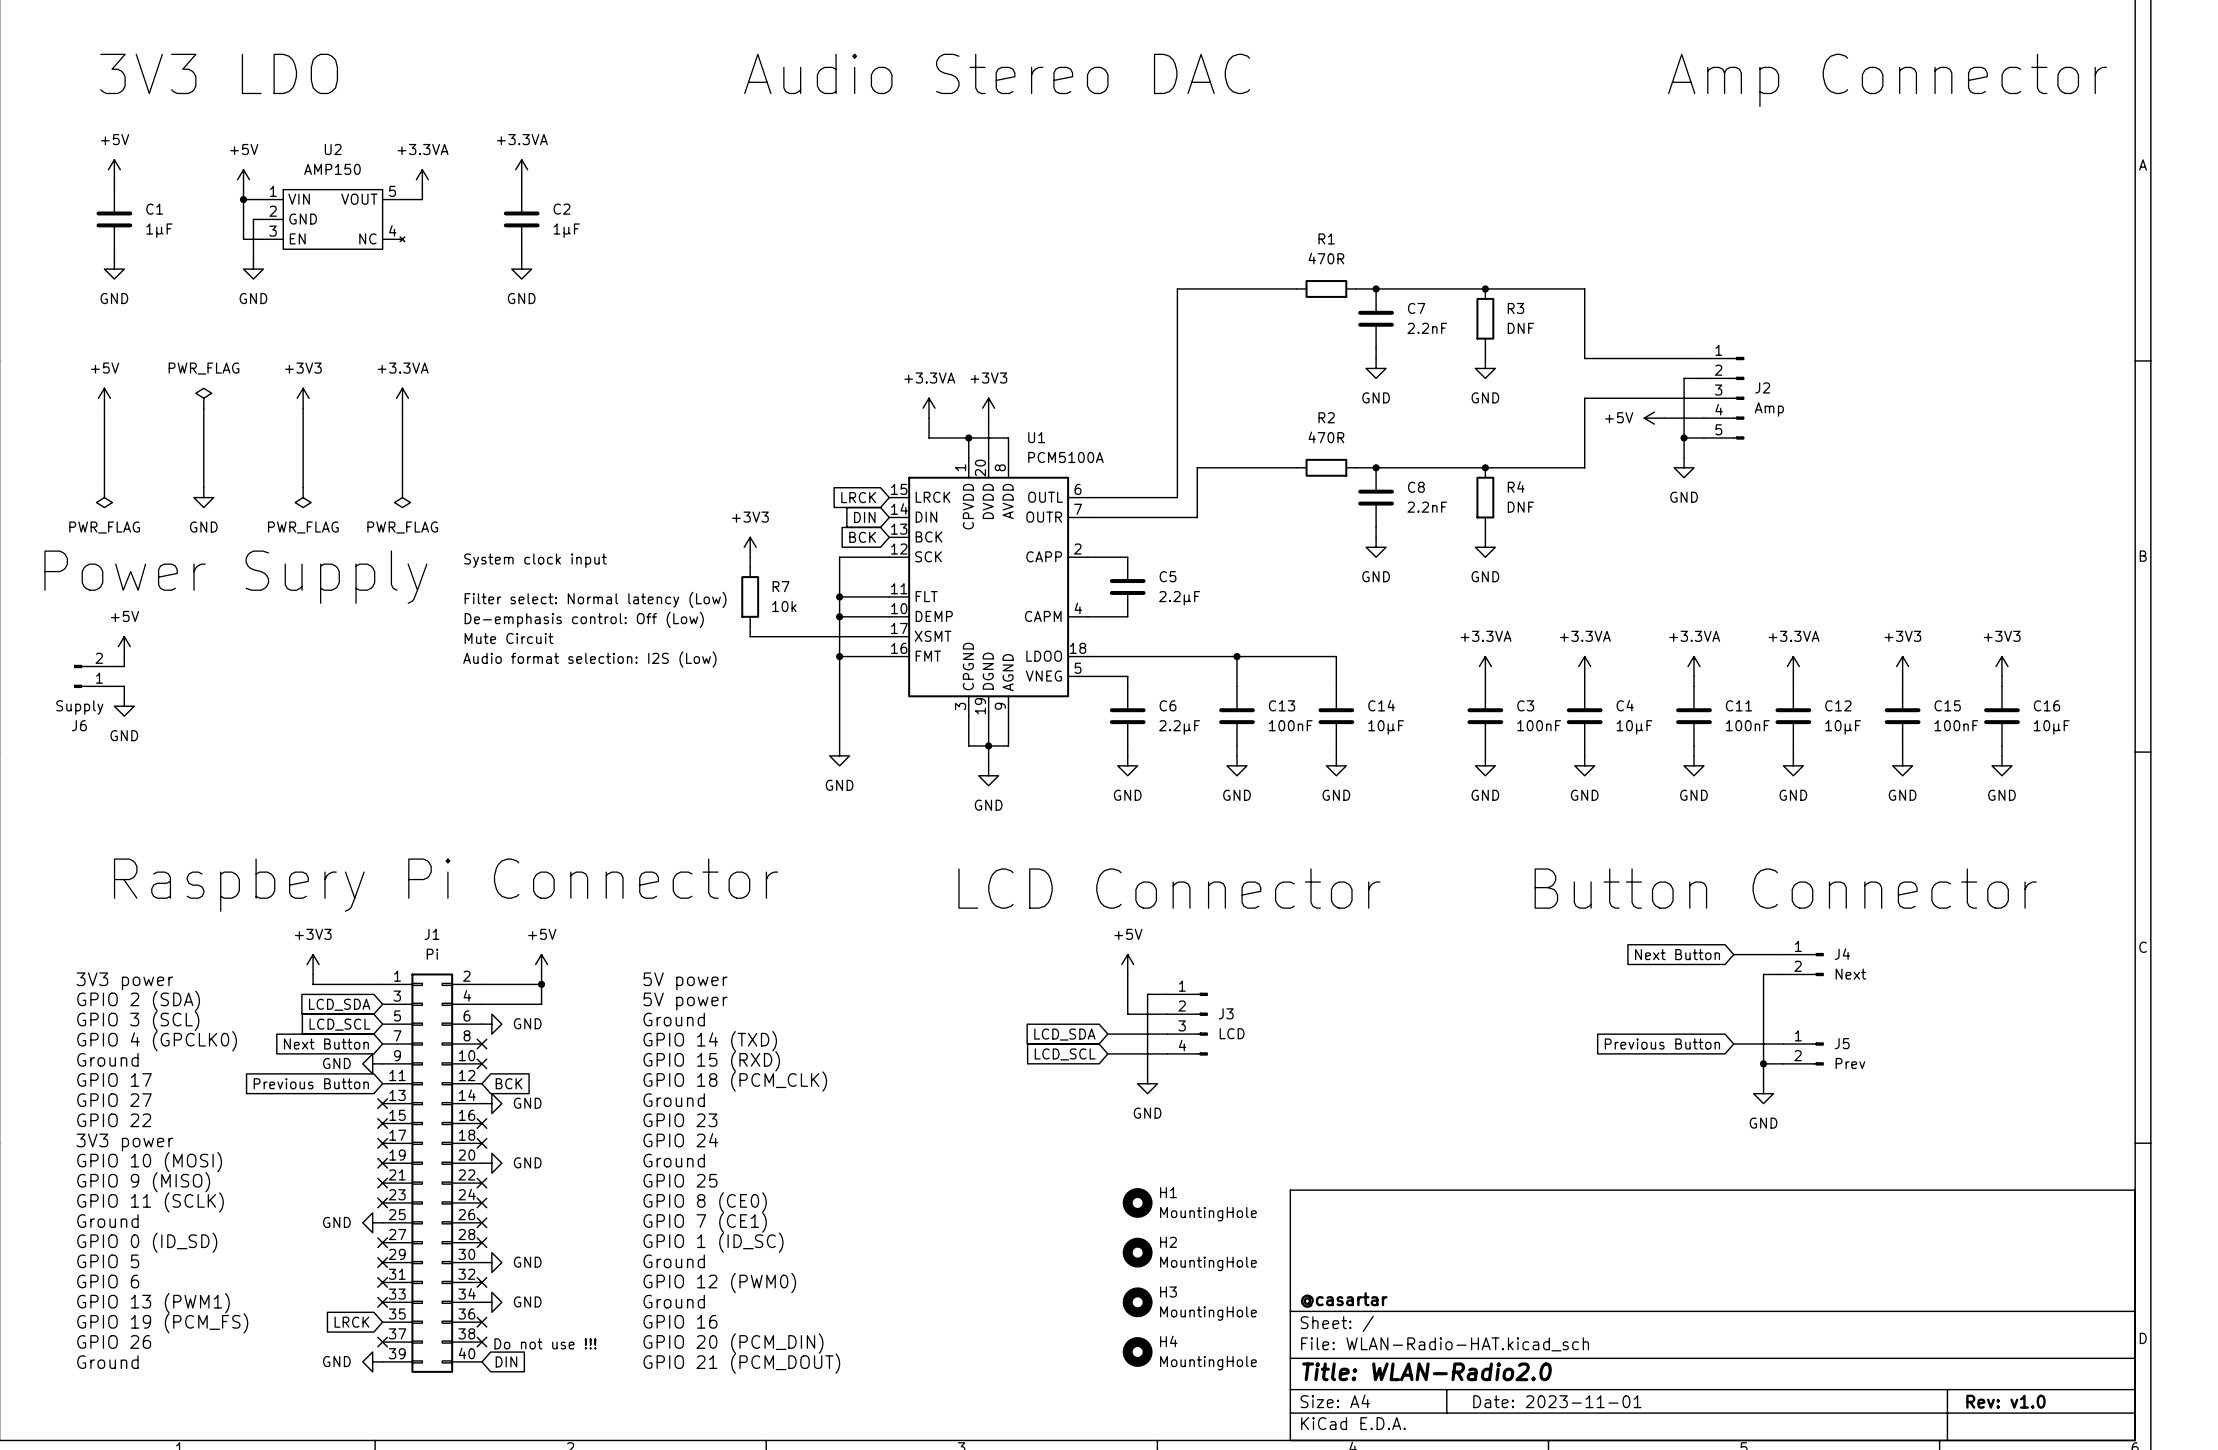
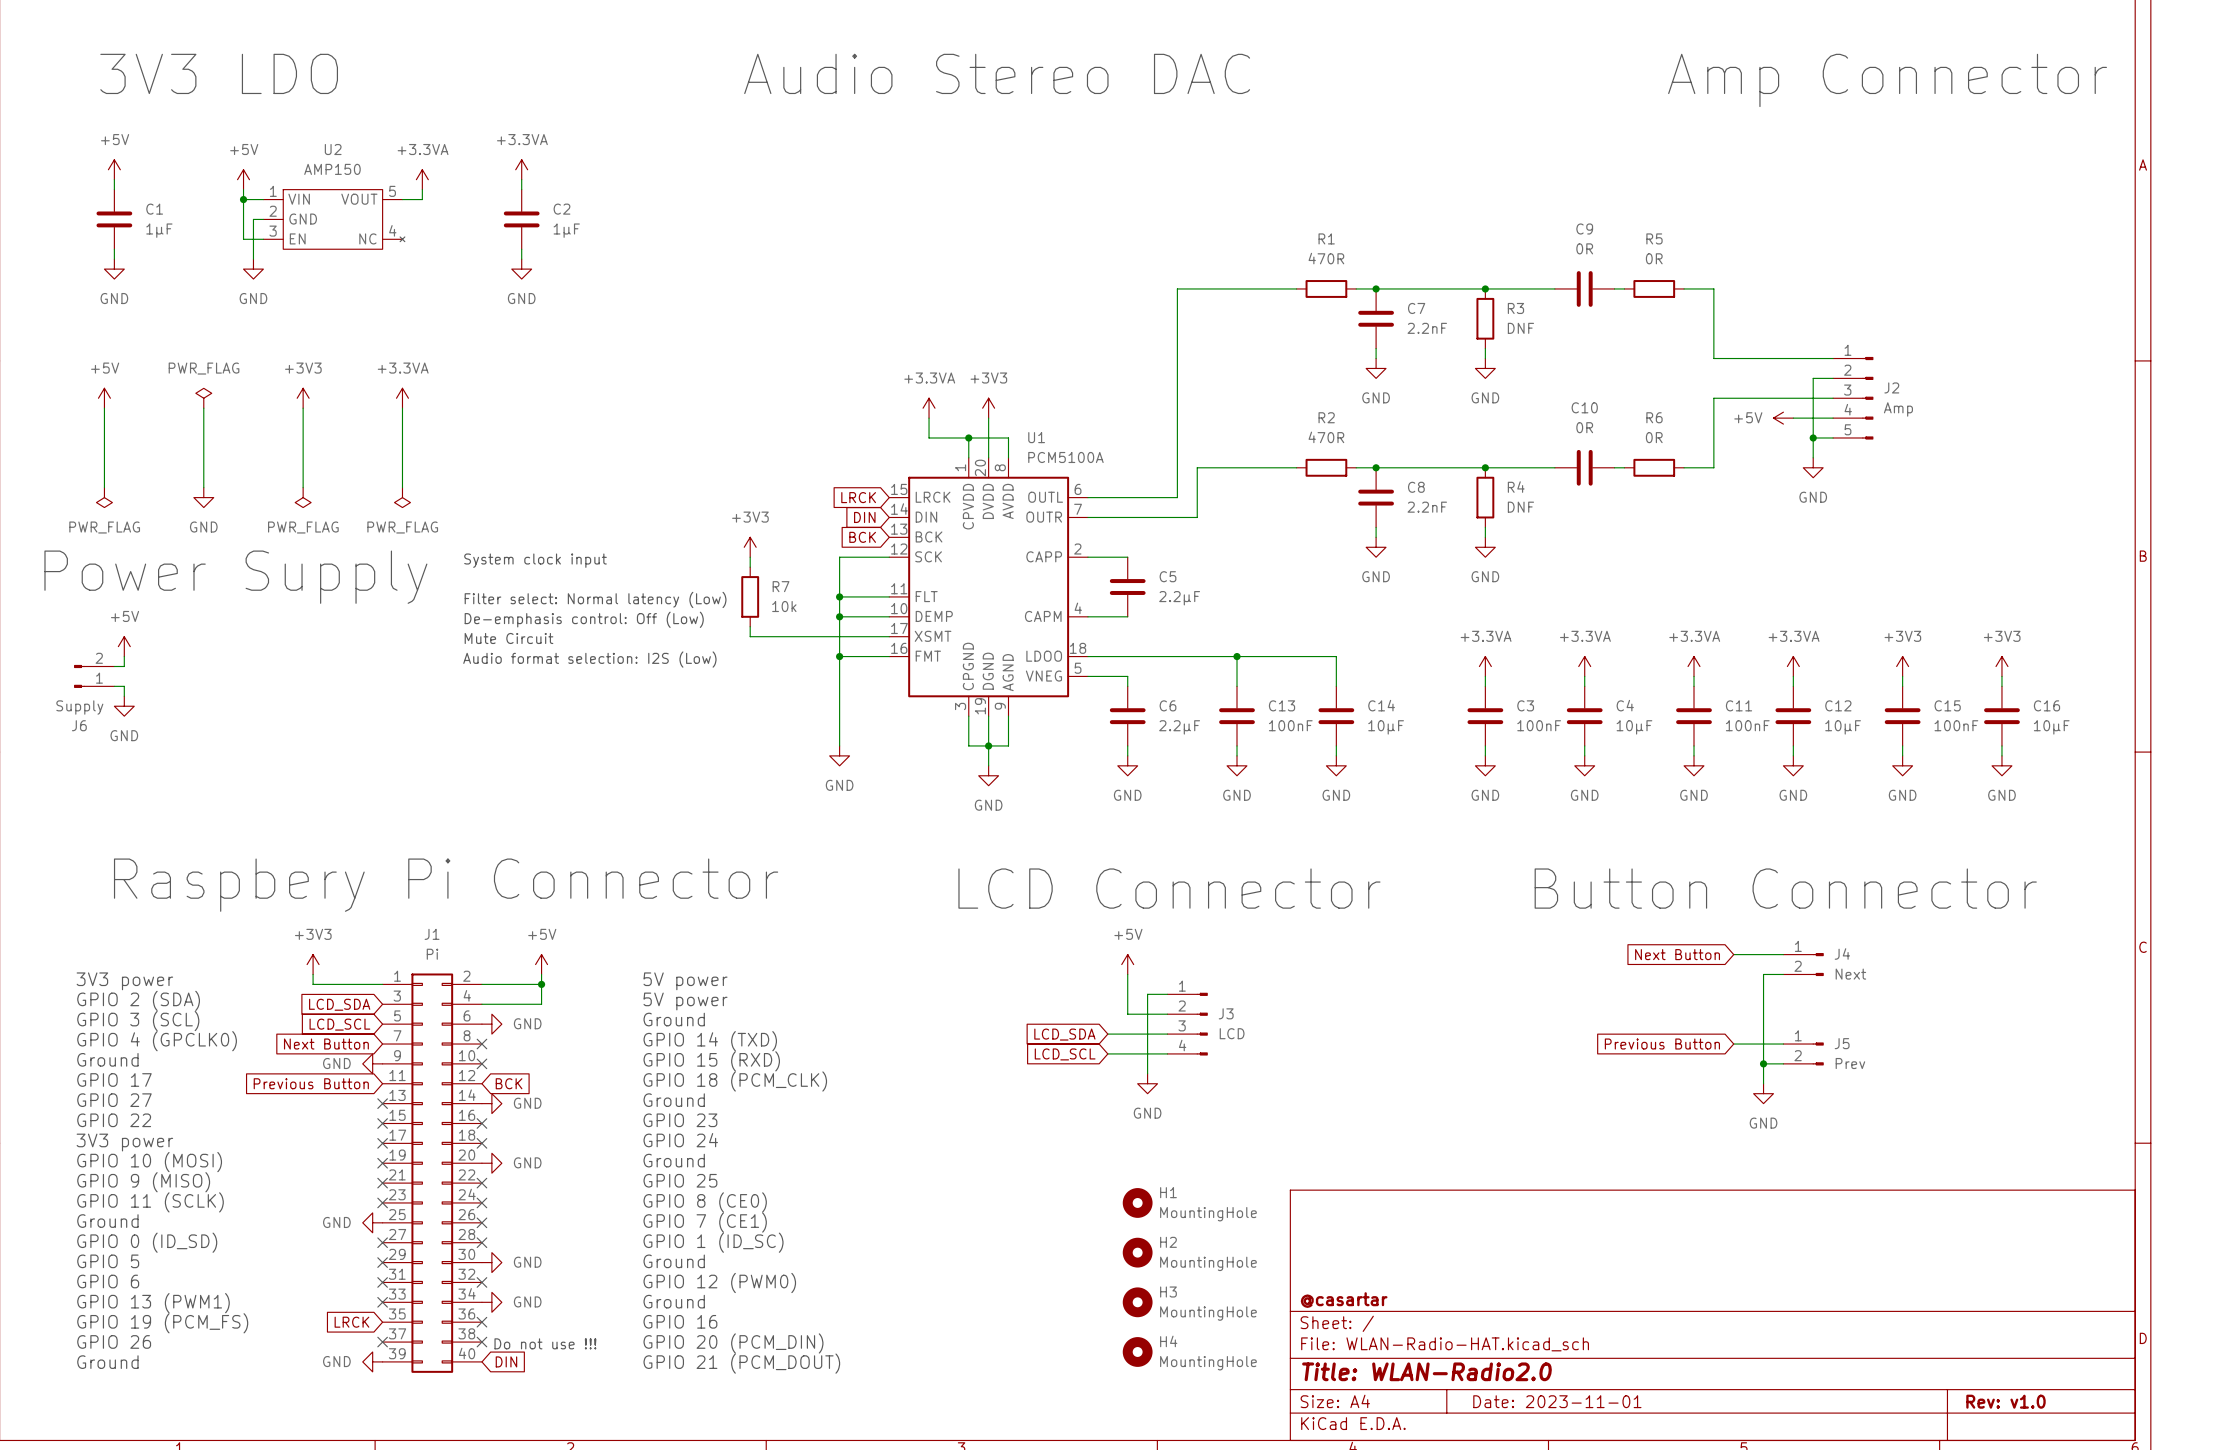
wire: (1554, 288) (1584, 288) (1584, 358) (1703, 358) -> (1684, 288) (1713, 288) (1713, 358) (1833, 358)
C9: none -> 0R (1584, 288)
wire: none -> (1614, 288) (1624, 288)
R5: none -> 0R (1654, 288)
wire: (1703, 378) (1684, 378) (1684, 457) -> (1833, 378) (1813, 378) (1813, 457)
wire: (1703, 398) (1584, 398) (1584, 467) (1554, 467) -> (1833, 398) (1713, 398) (1713, 467) (1684, 467)
J2 position: (1724, 398) -> (1853, 398)
power symbol position: +5V (1654, 418) -> +5V (1783, 418)
wire: (1664, 418) (1703, 418) -> (1793, 418) (1833, 418)
wire: (1684, 437) (1703, 437) -> (1813, 437) (1833, 437)
junction: (1684, 437) -> none
junction: none -> (1813, 437)
C10: none -> 0R (1584, 467)
wire: none -> (1614, 467) (1624, 467)
R6: none -> 0R (1654, 467)
power symbol position: GND (1684, 467) -> GND (1813, 467)

